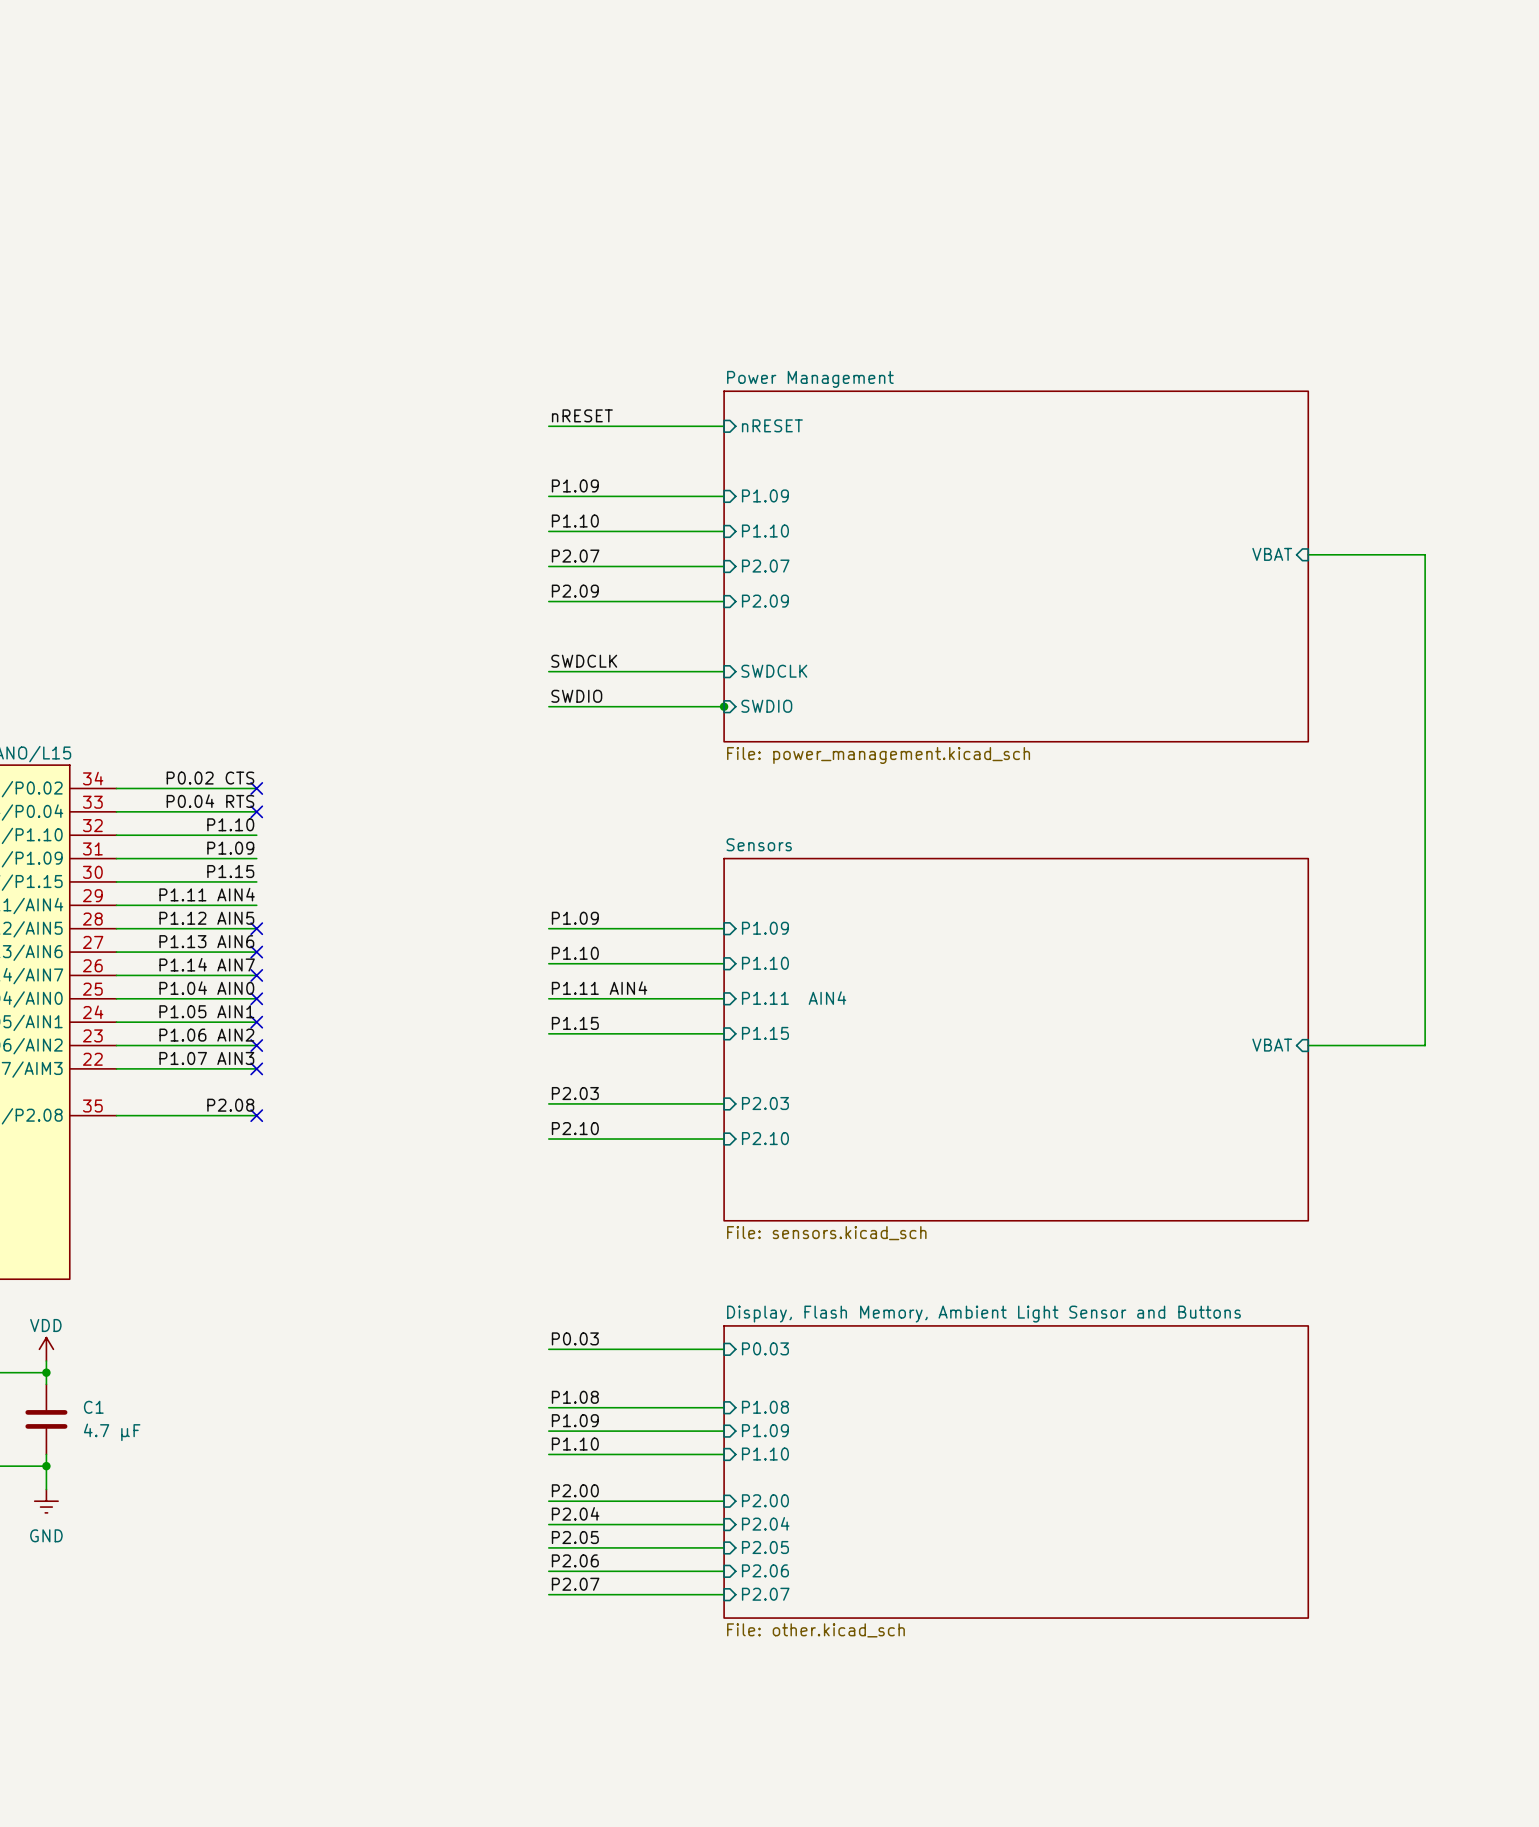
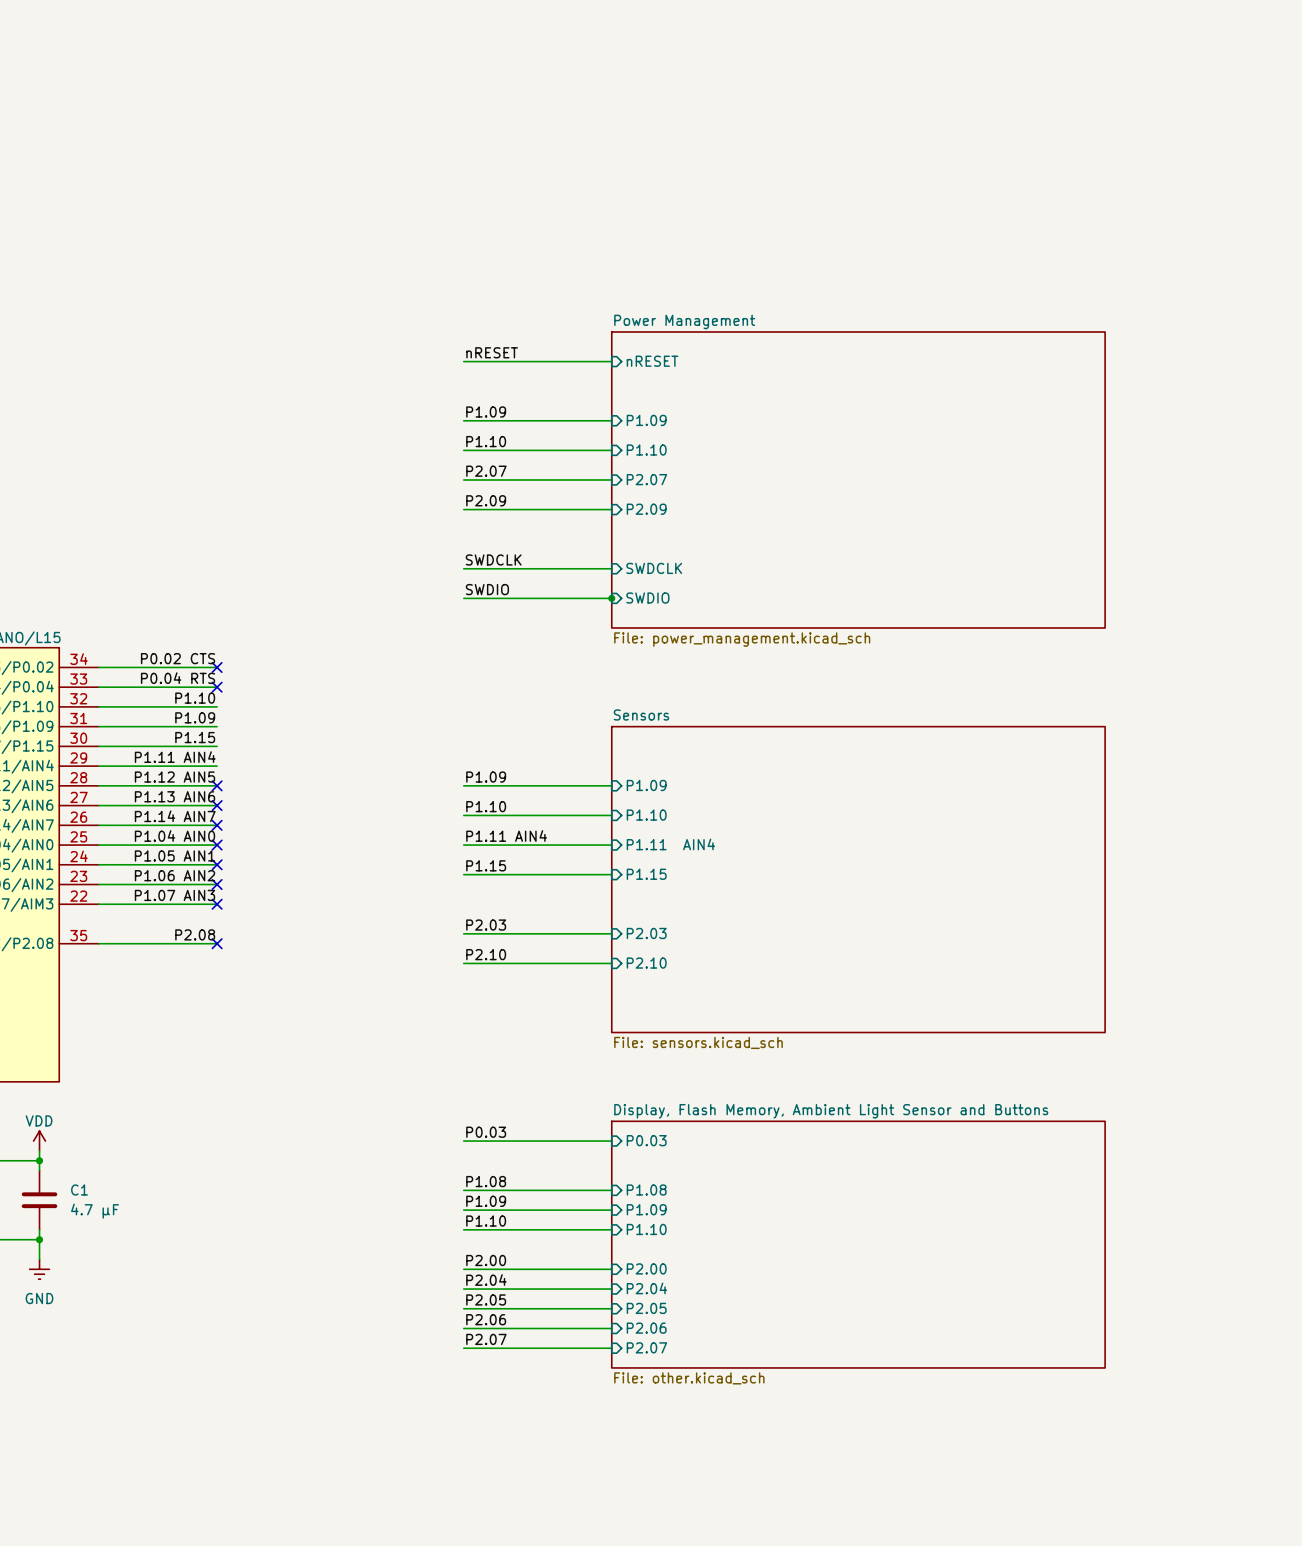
sheet pin: VBAT (1272, 554) -> none
wire: (1308, 554) (1425, 554) (1425, 1045) (1308, 1045) -> none
sheet pin: VBAT (1272, 1045) -> none

